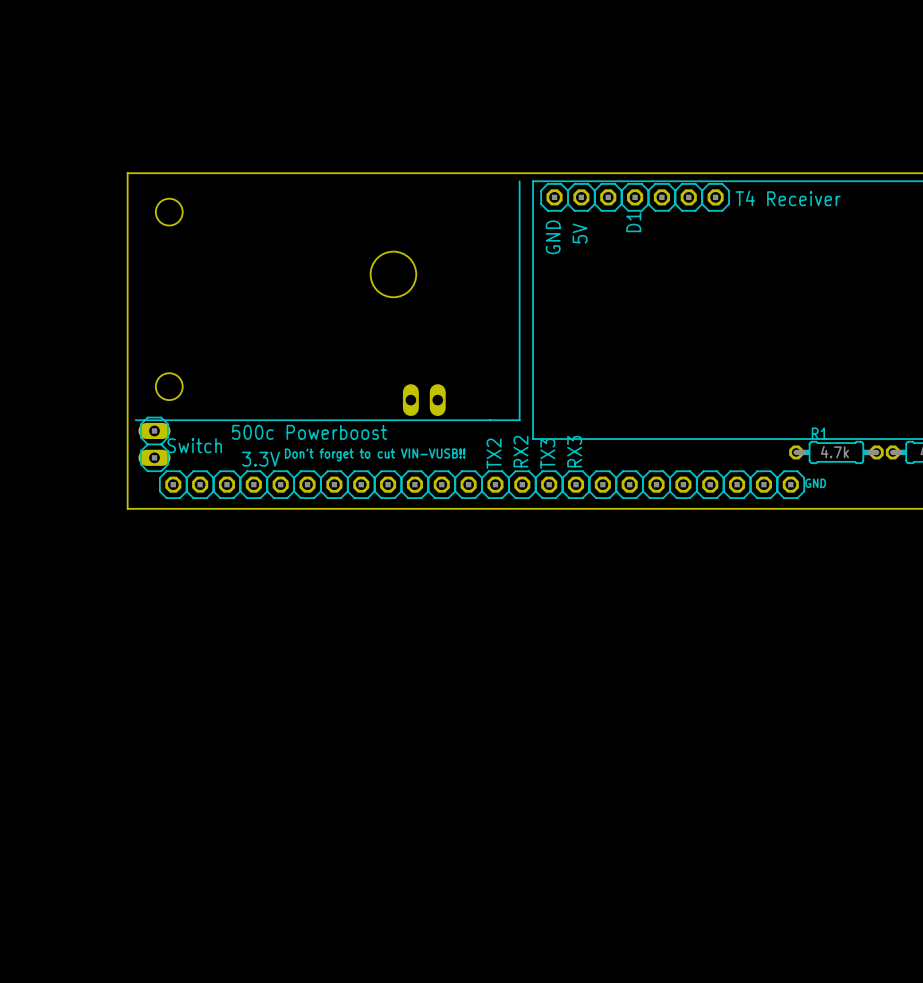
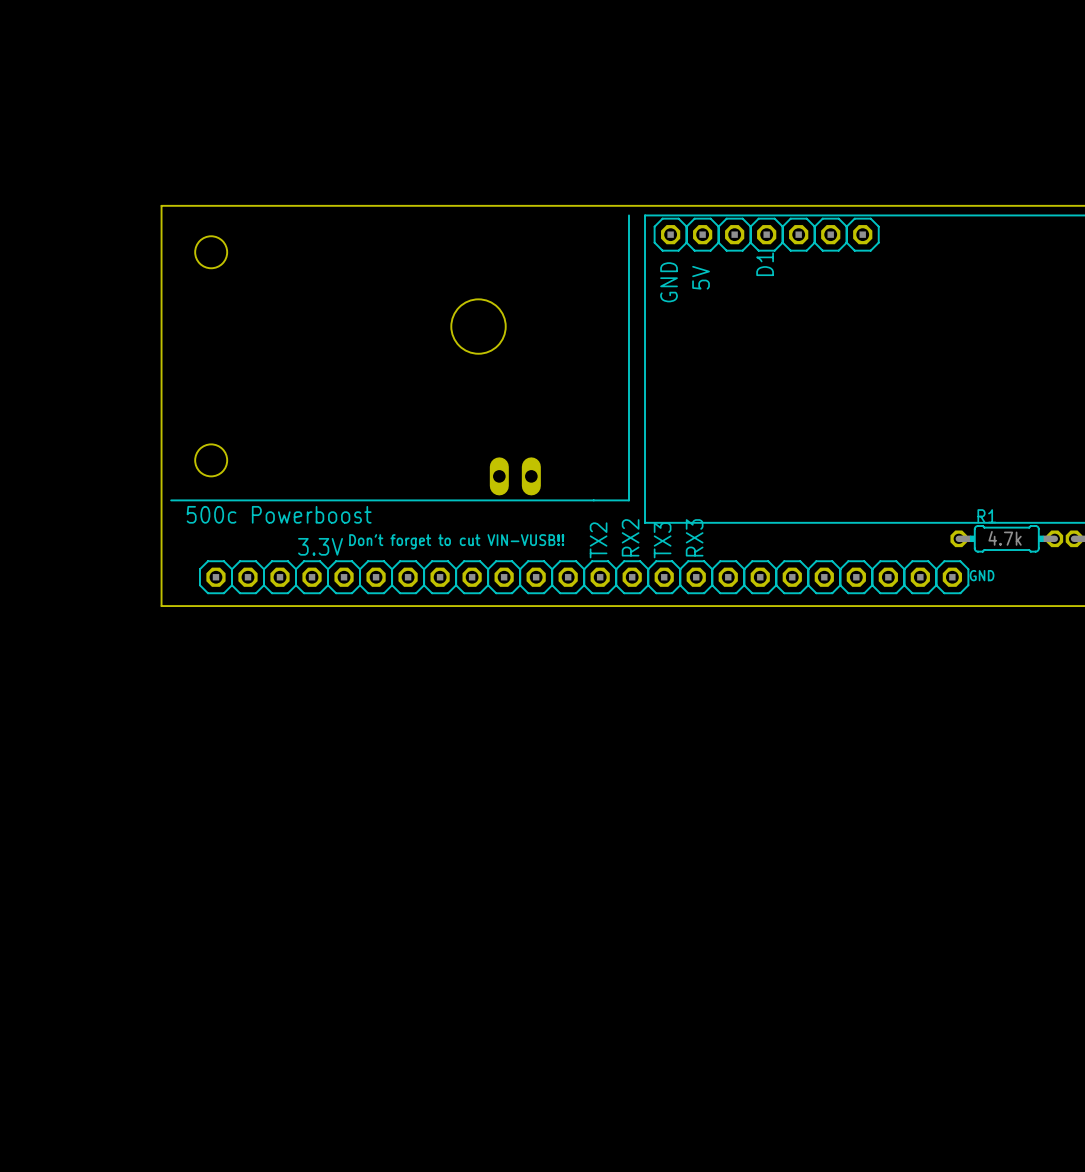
text: T4 Receiver (788, 198) -> none
text position: 500c Powerboost (309, 432) -> 500c Powerboost (279, 514)
part: (154, 444) -> none
text: Switch (194, 445) -> none

